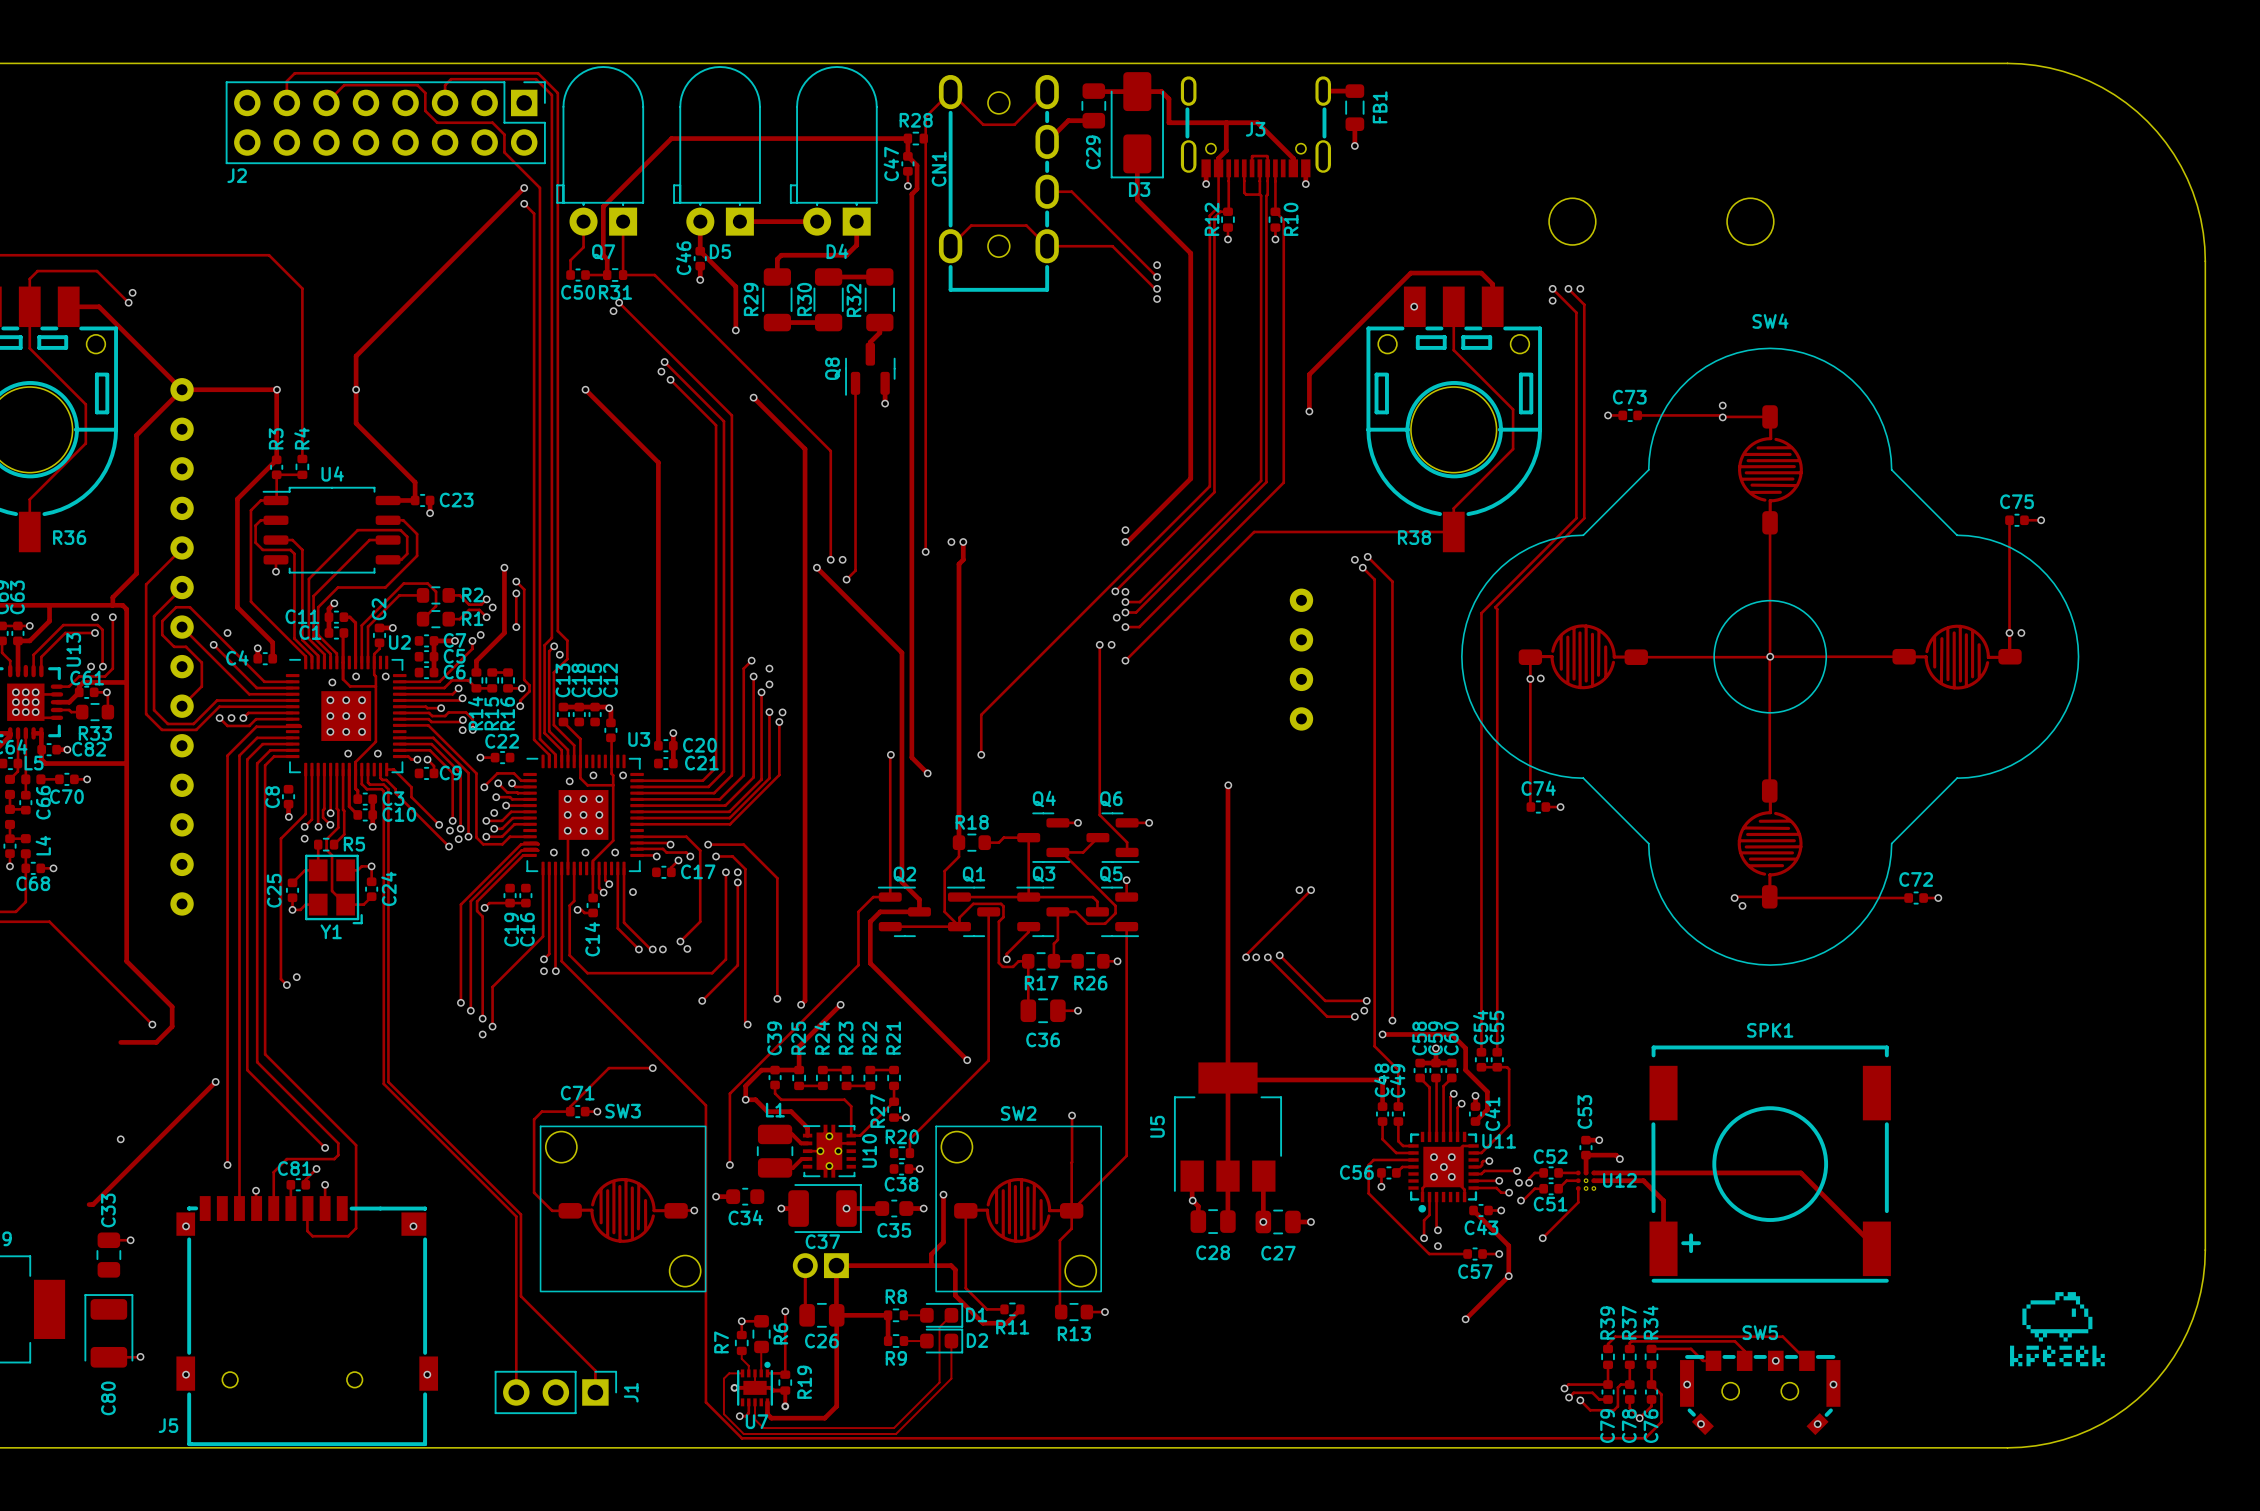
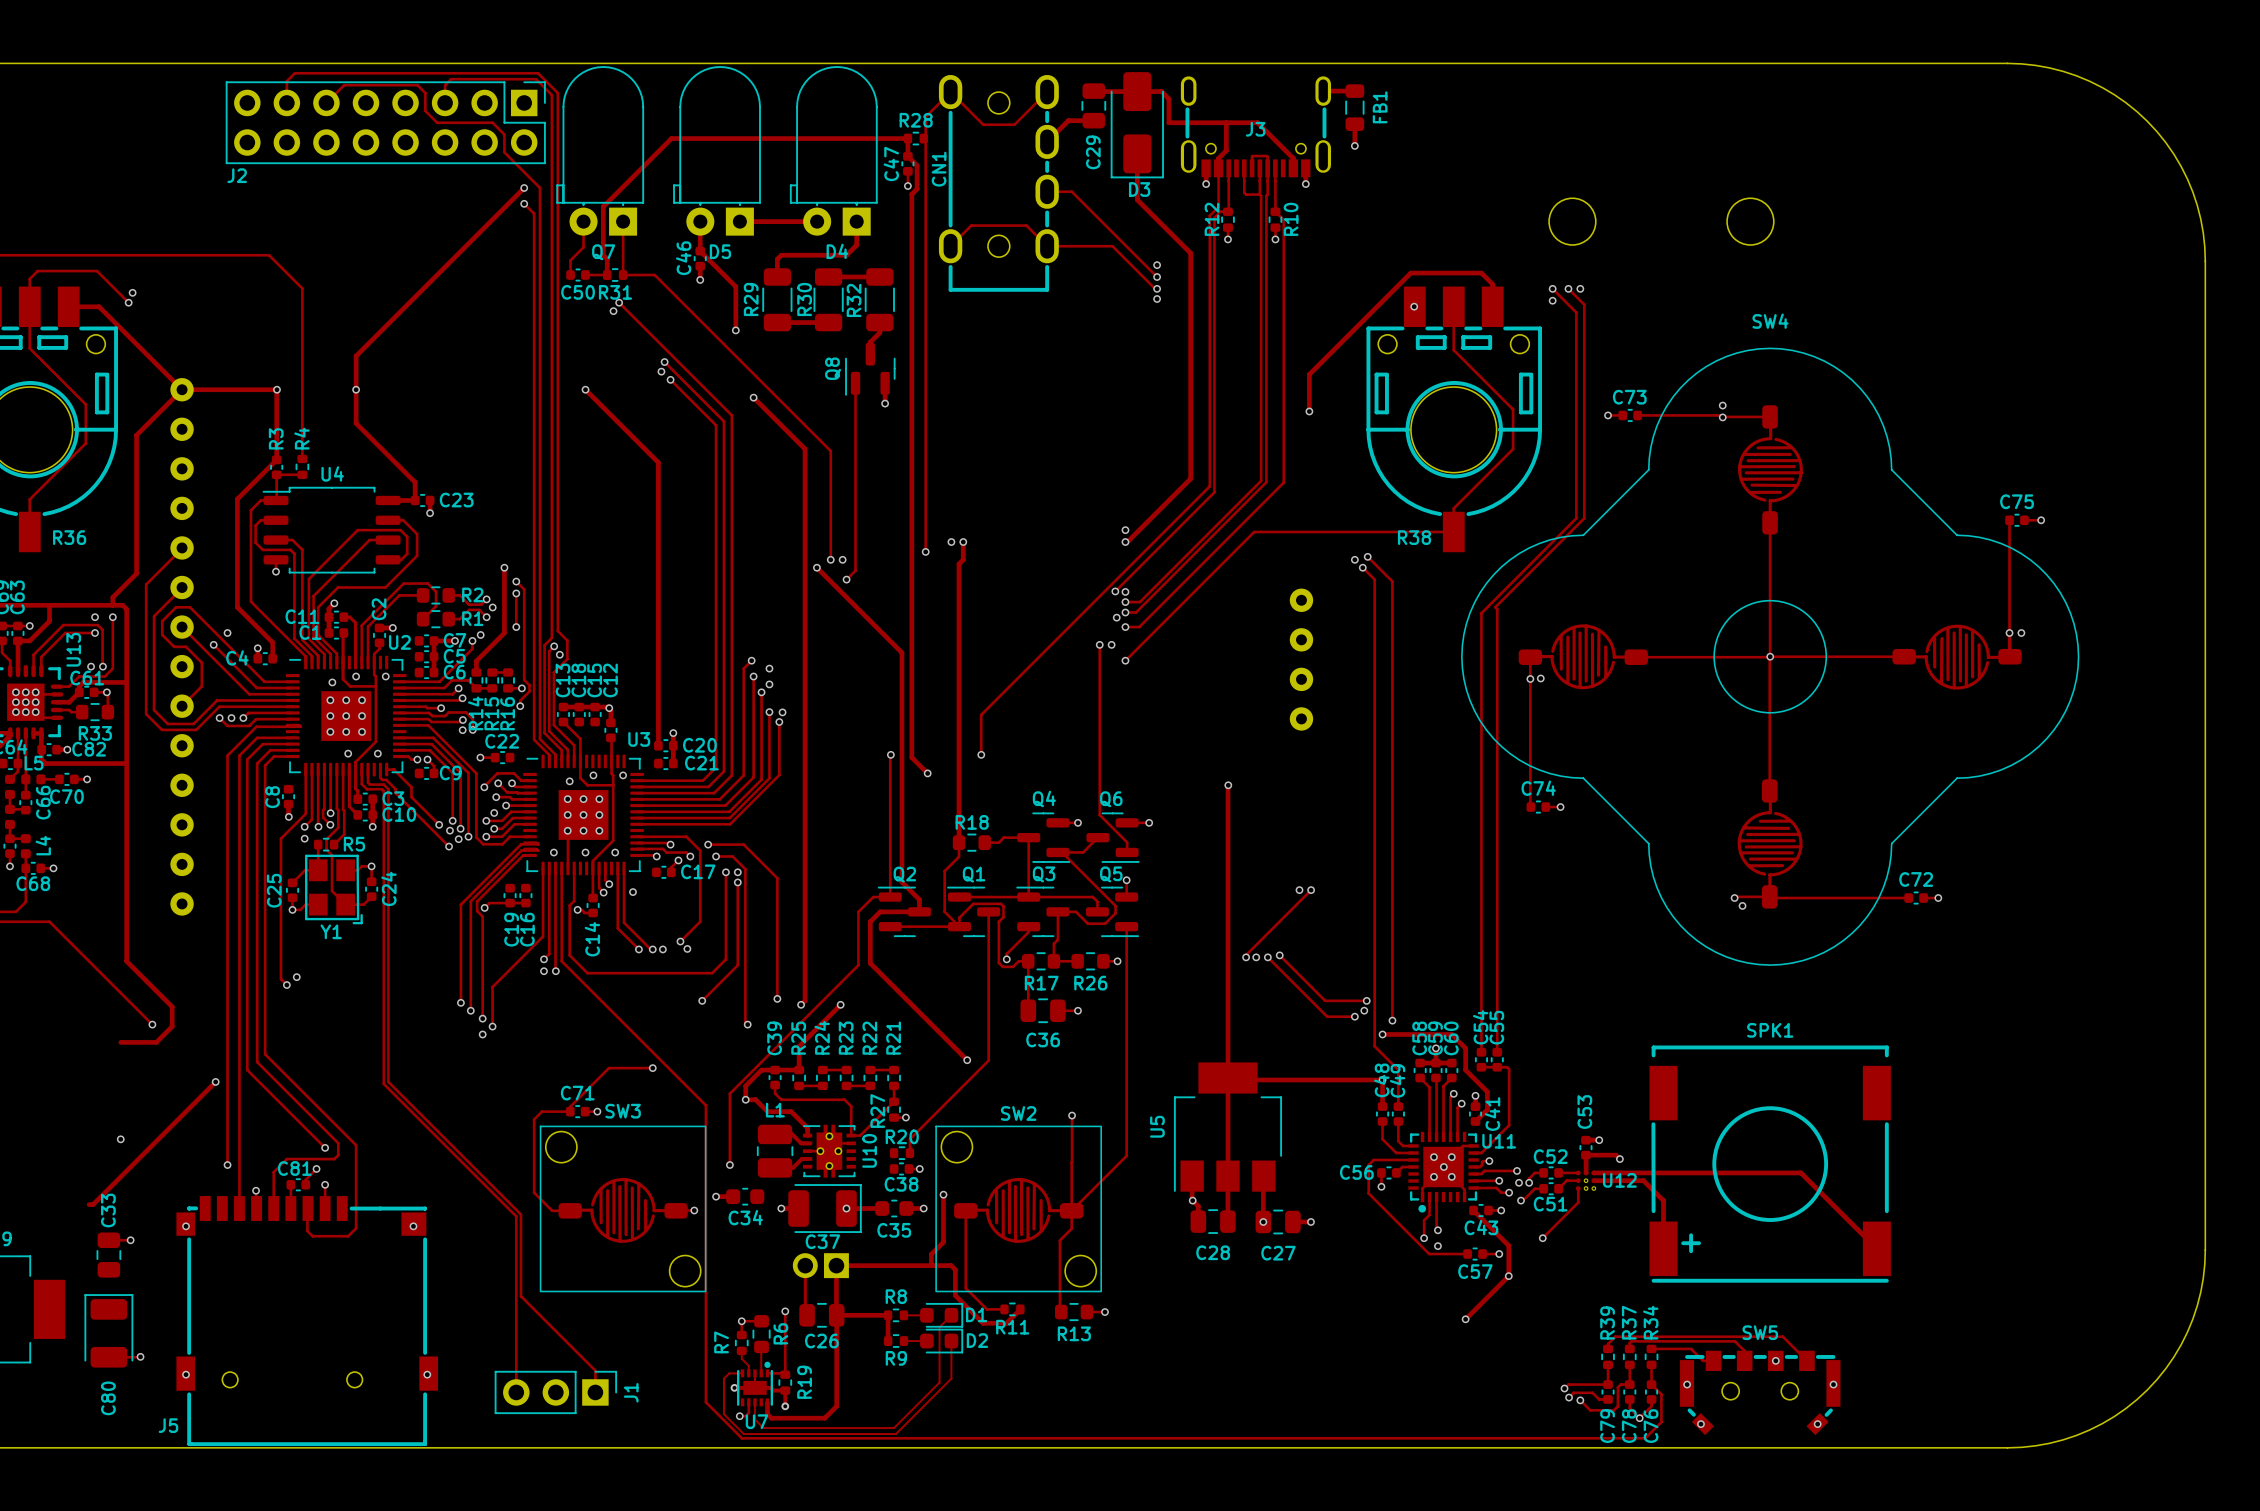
drawing: [2010, 1292, 2105, 1367] -> none

